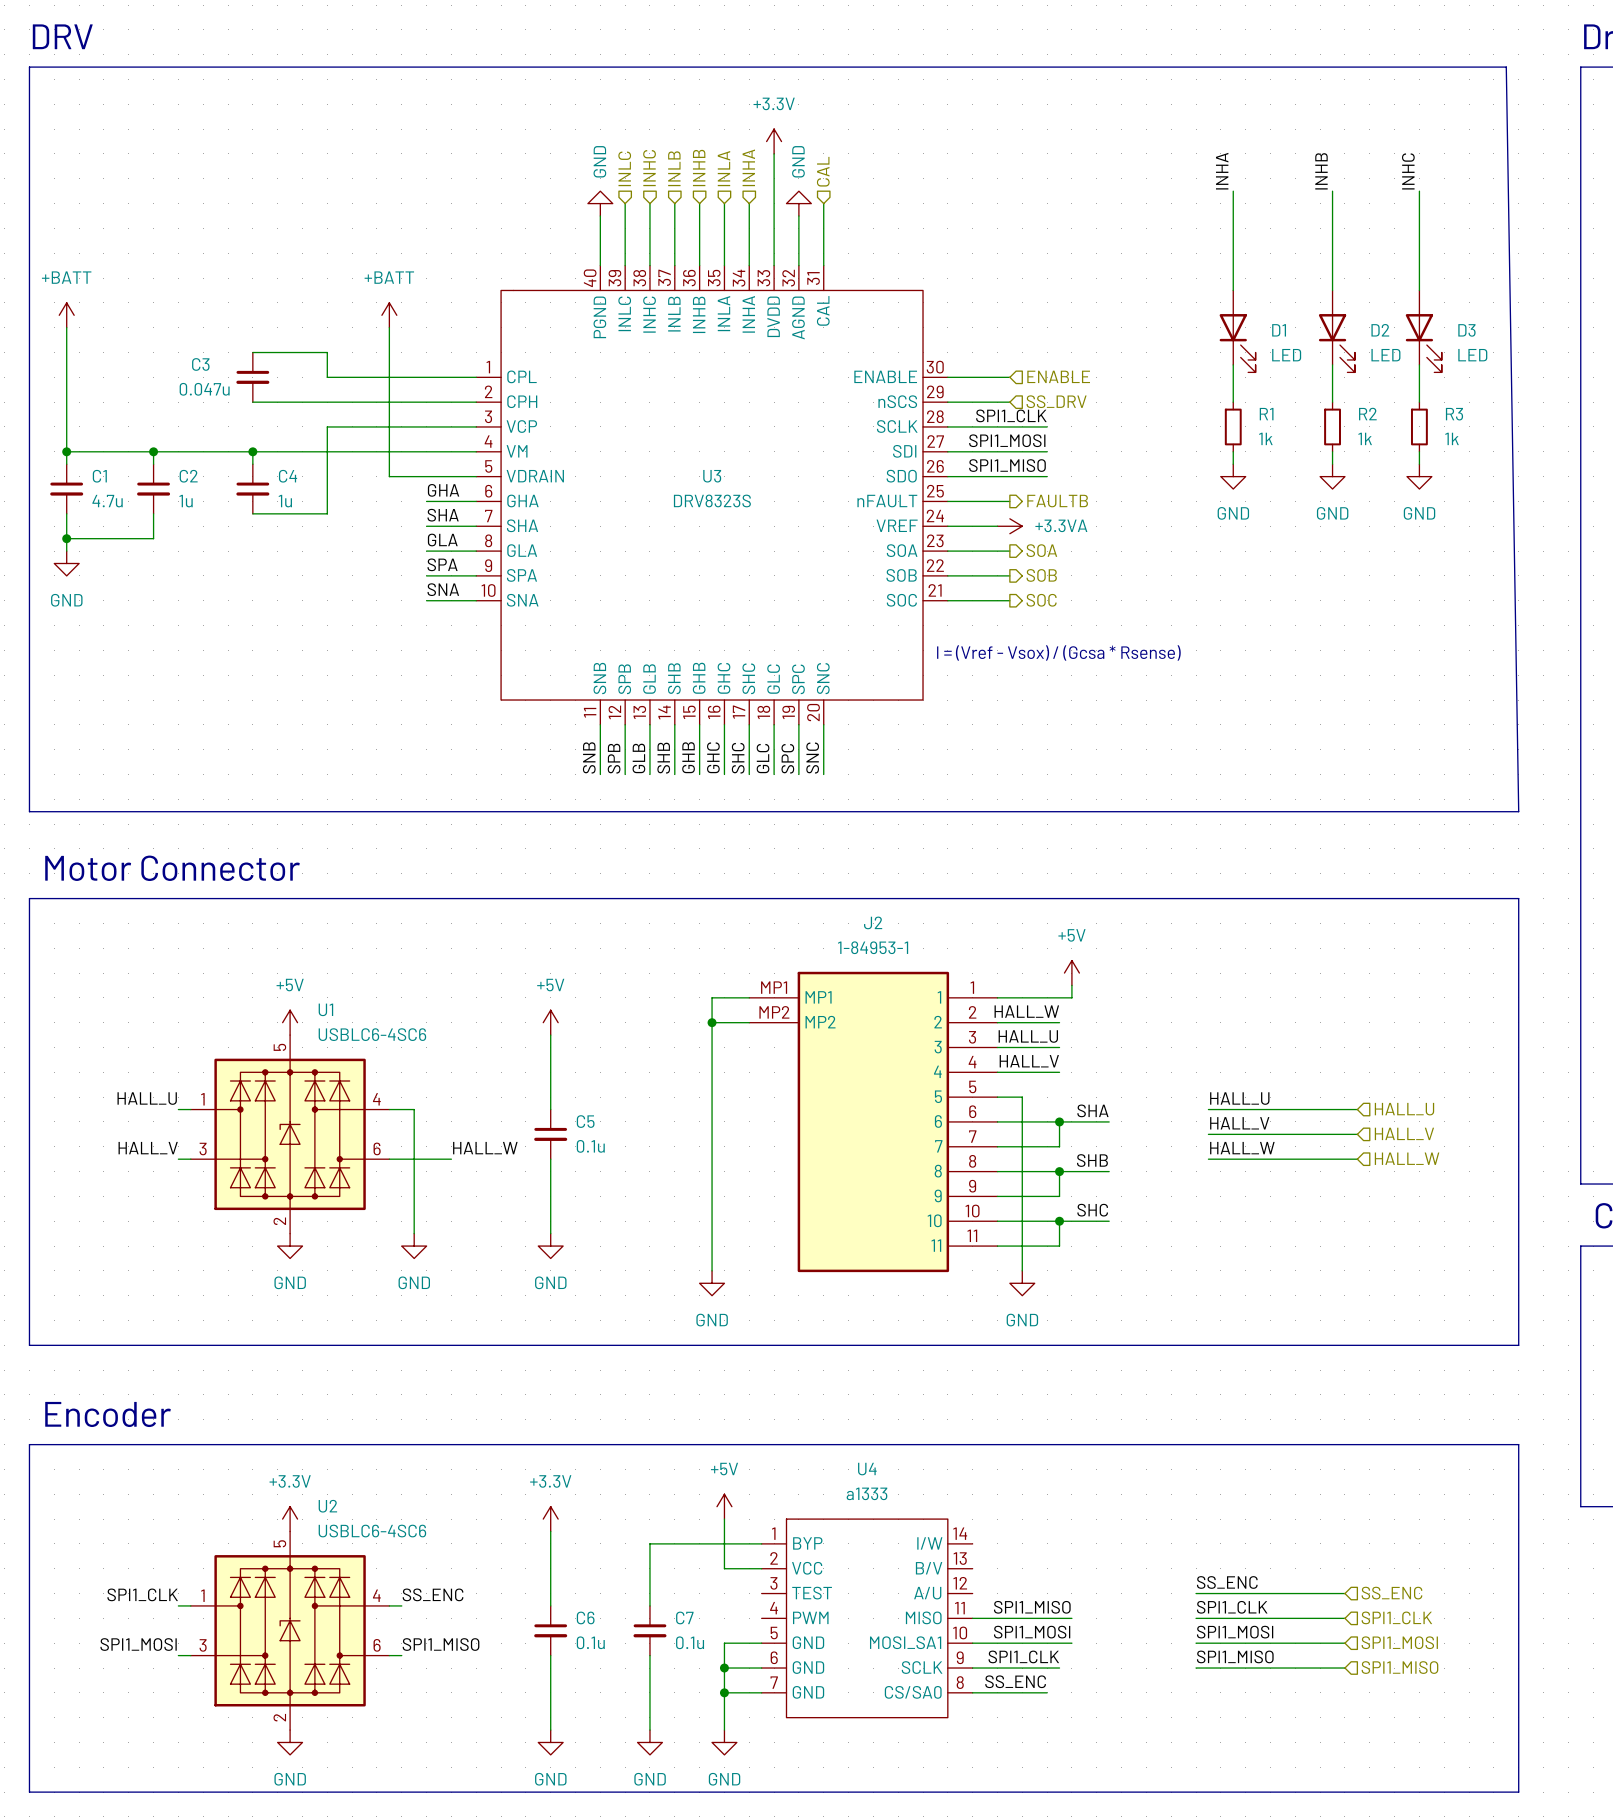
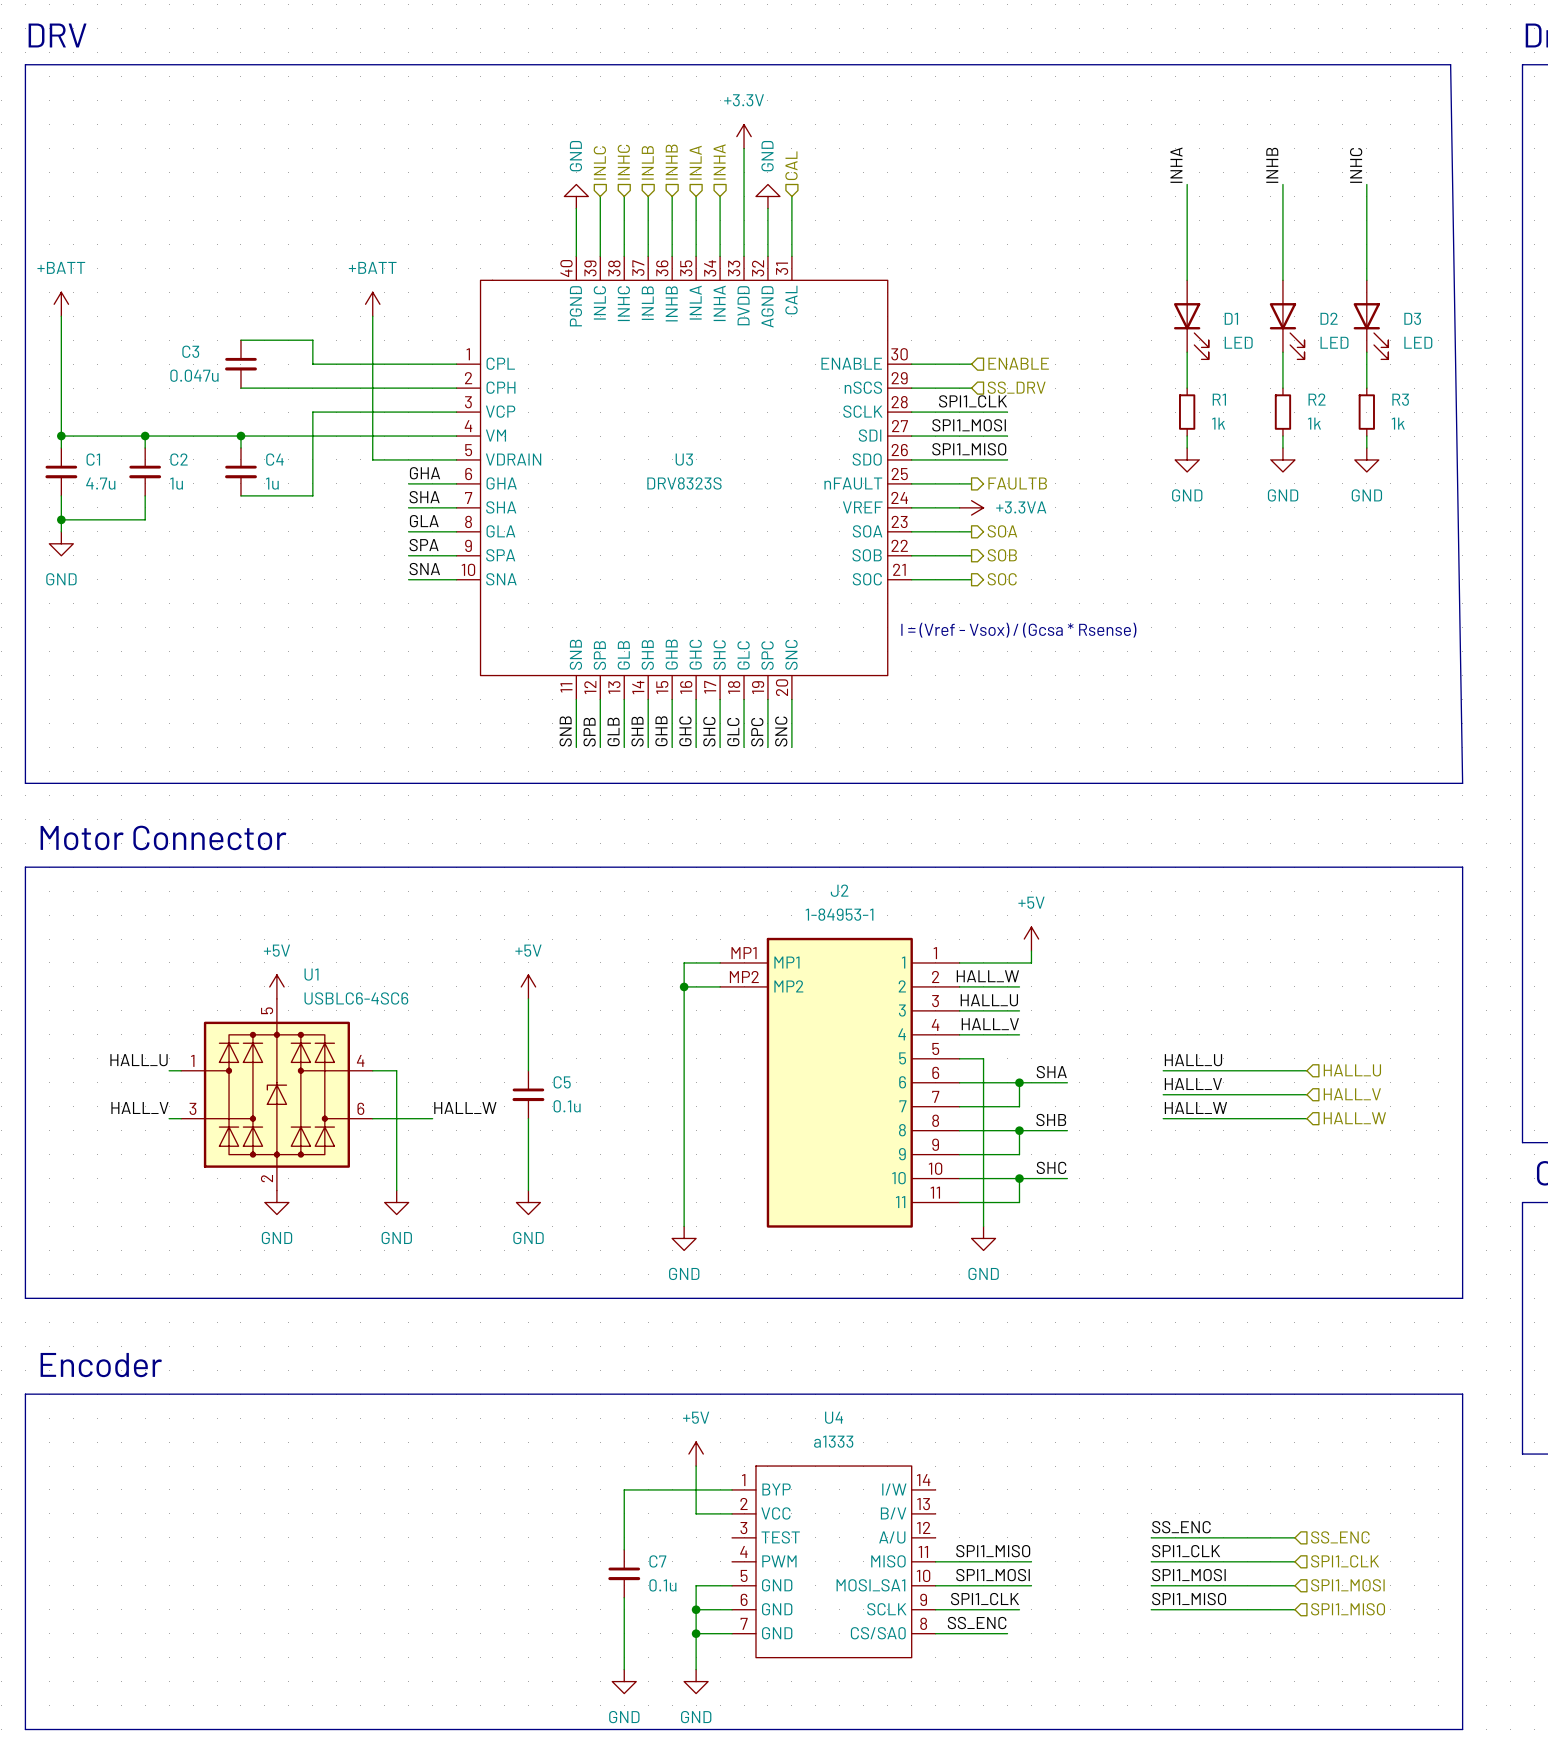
power symbol: +3.3V (290, 1519) -> none
power symbol: +3.3V (550, 1519) -> none
wire: (550, 1531) (550, 1605) -> none
label: SPI1_CLK (142, 1594) -> none
label: SS_ENC (433, 1594) -> none
wire: (178, 1605) (190, 1605) -> none
wire: (389, 1605) (401, 1605) -> none
U2: USBLC6-4SC6 (290, 1630) -> none
C6: 0.1u (550, 1630) -> none
label: SPI1_MOSI (138, 1644) -> none
label: SPI1_MISO (441, 1644) -> none
wire: (178, 1655) (190, 1655) -> none
wire: (389, 1655) (401, 1655) -> none
wire: (550, 1655) (550, 1730) -> none
power symbol: GND (290, 1742) -> none
power symbol: GND (550, 1742) -> none

